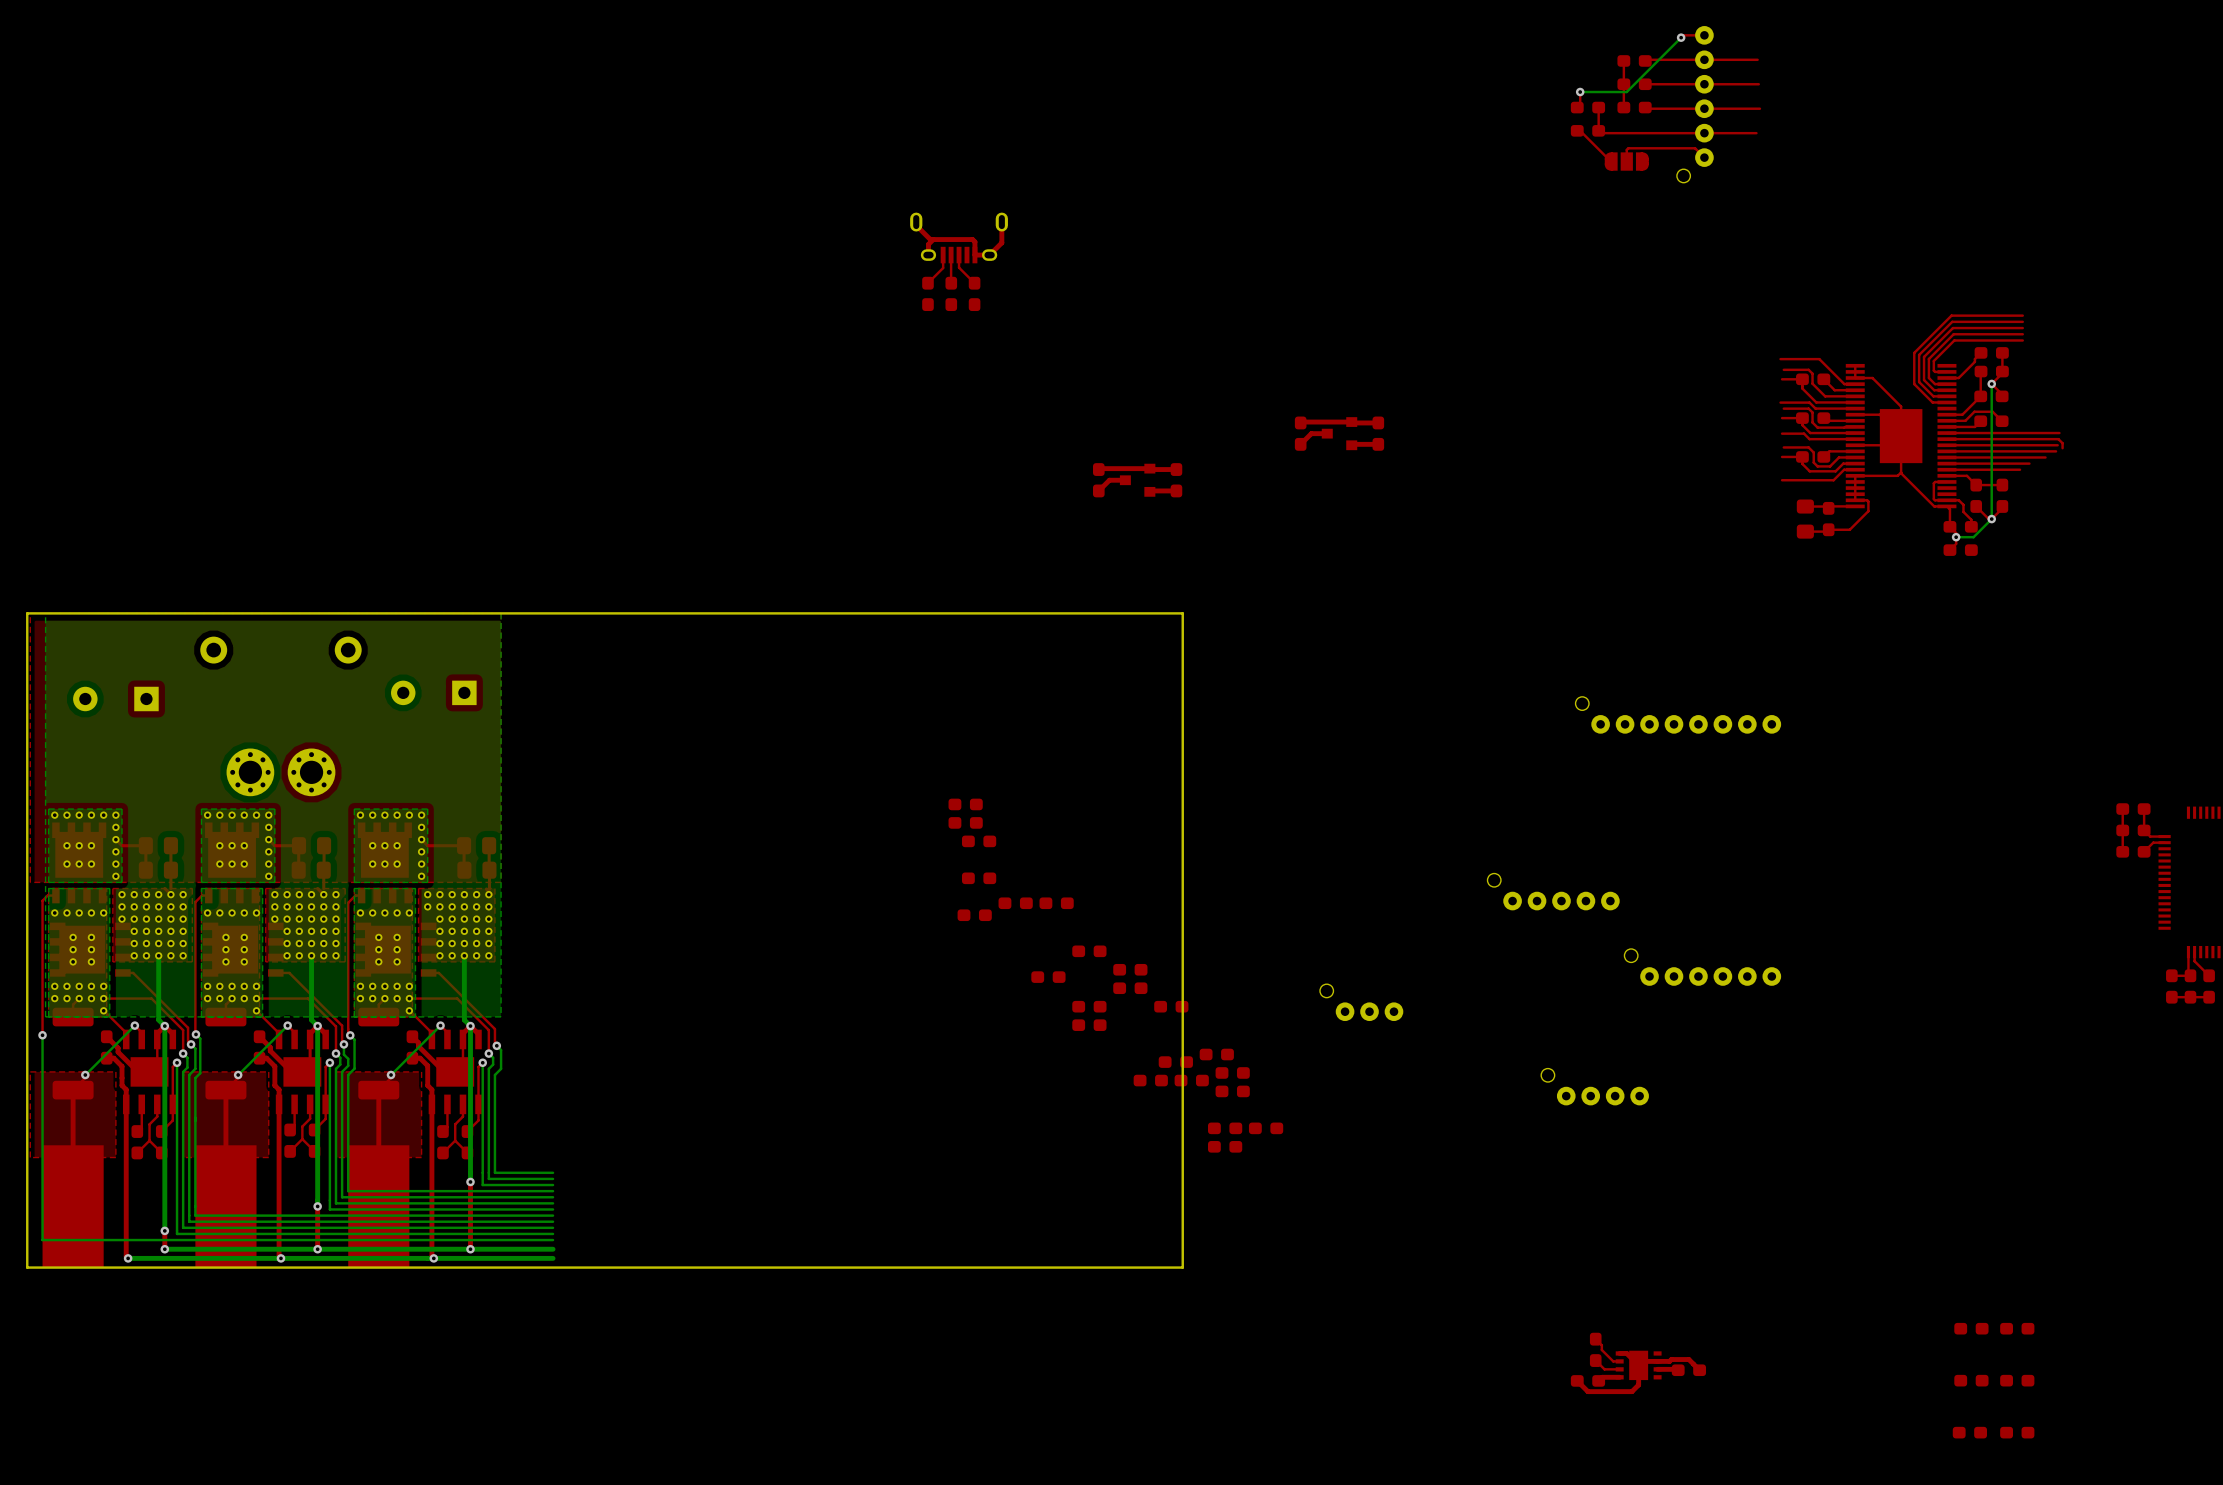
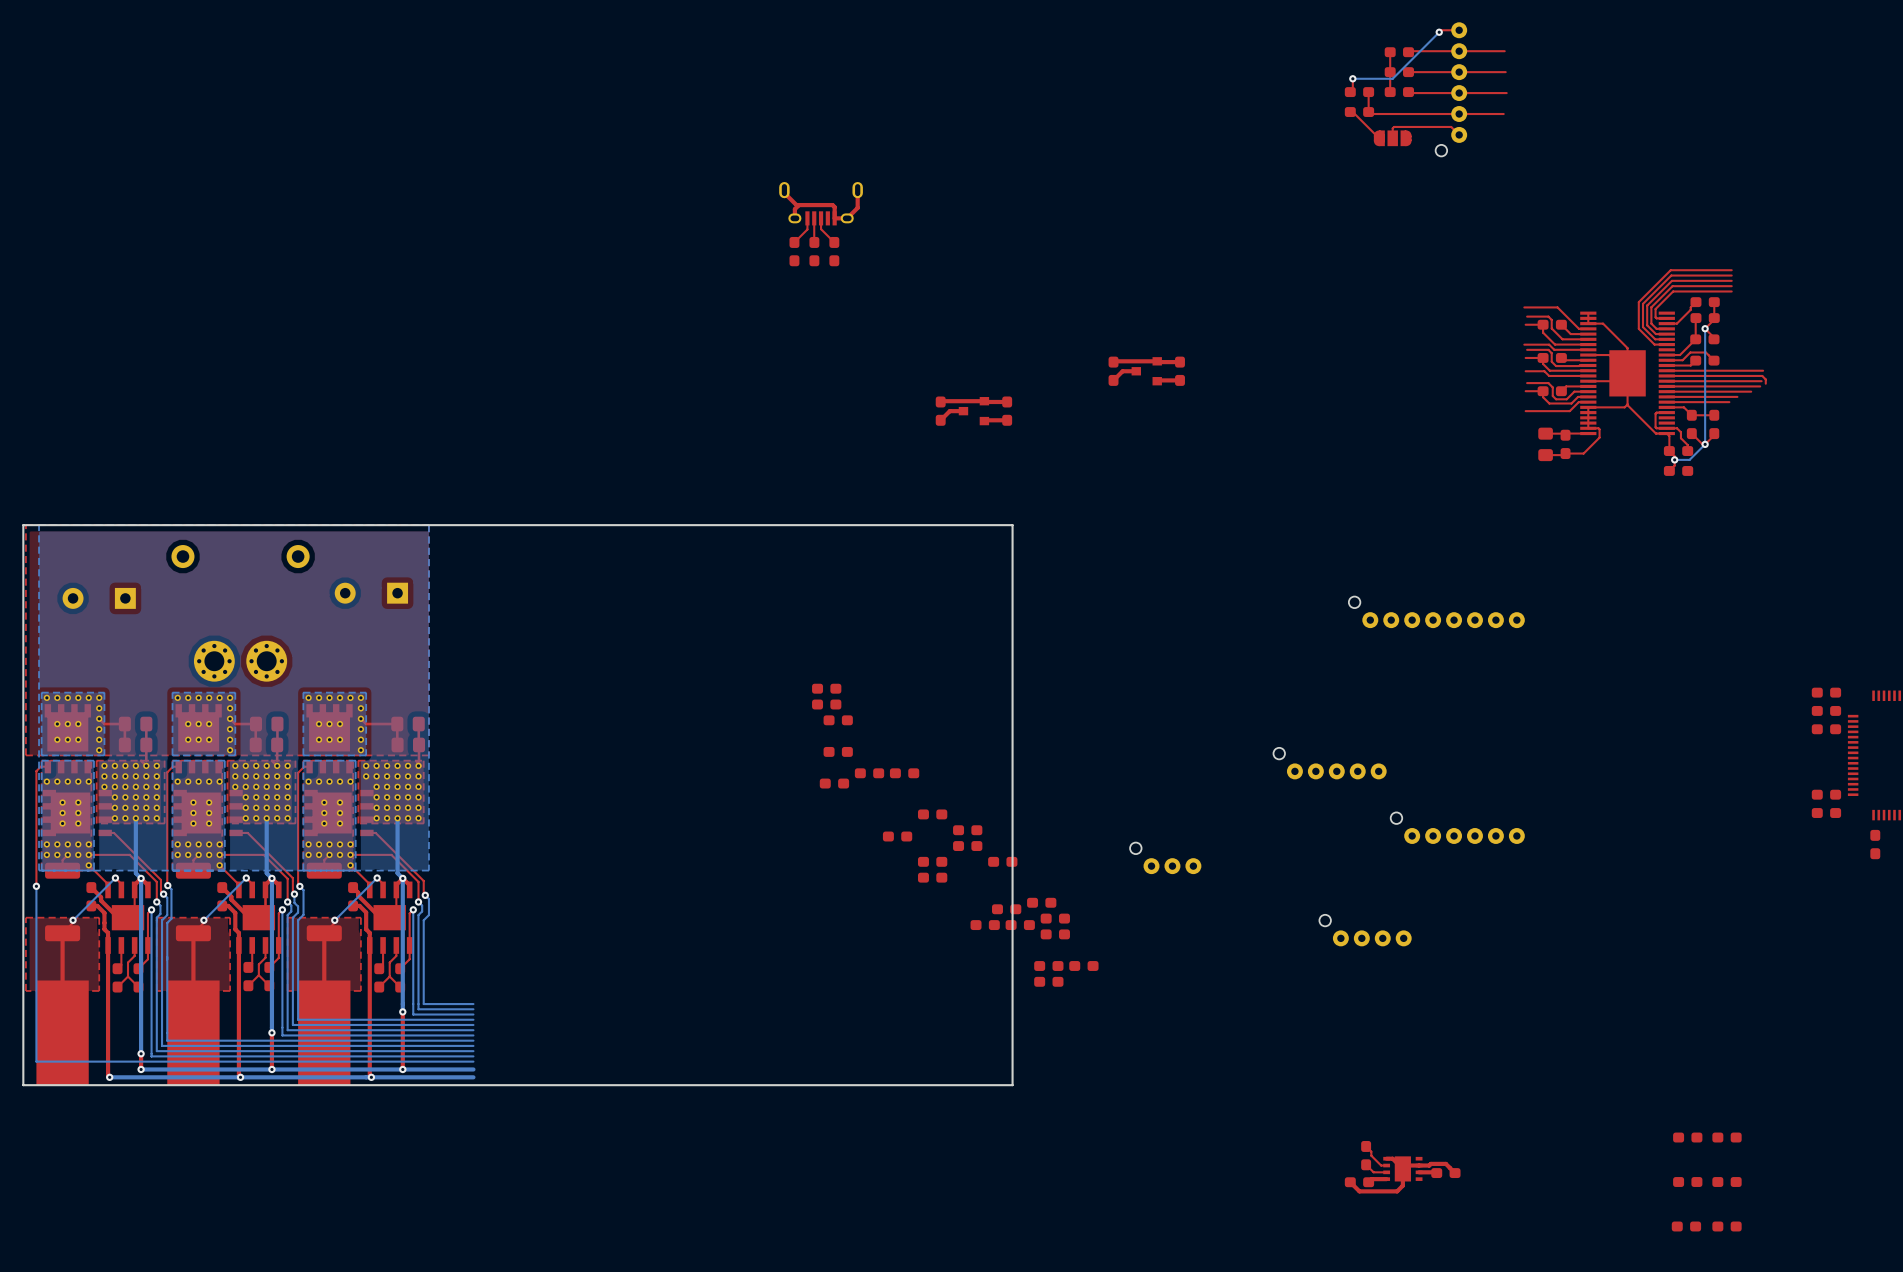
top track: (2122, 809) (2122, 851) -> none
top track: (2144, 809) (2144, 830) (2150, 836) (2164, 836) -> none
top track: (2164, 842) (2153, 842) (2144, 851) -> none
part: none -> (1826, 794)
part: none -> (1826, 813)
top track: (2188, 952) (2188, 973) (2190, 975) (2171, 975) -> none
top track: (2194, 952) (2194, 961) (2209, 975) -> none
part: (2171, 986) -> none
part: (2209, 986) -> none
top track: (2209, 997) (2171, 997) -> none

